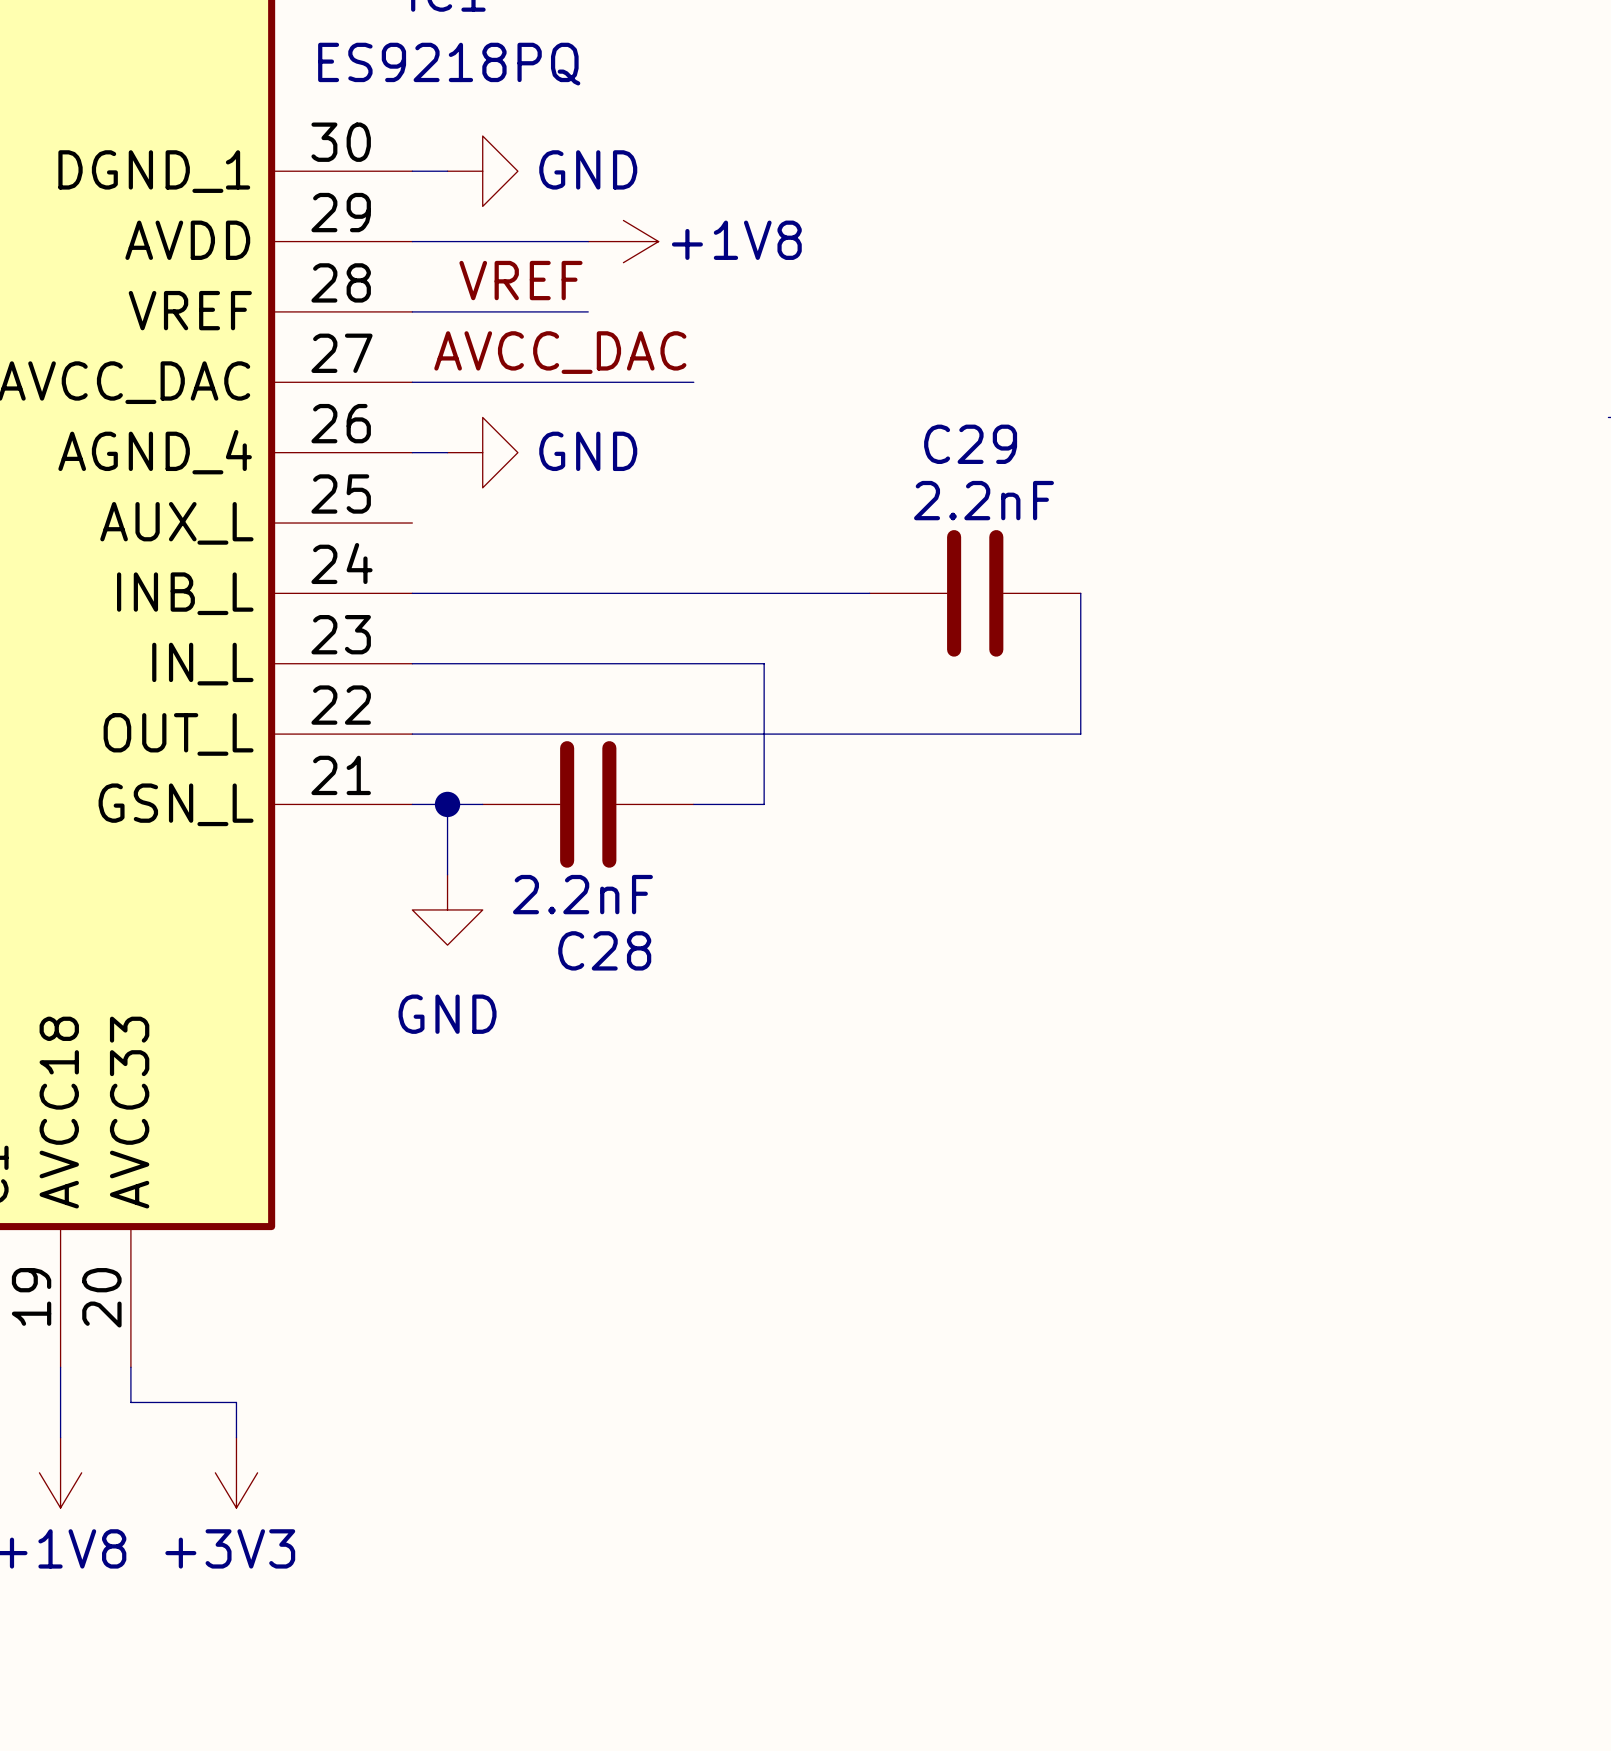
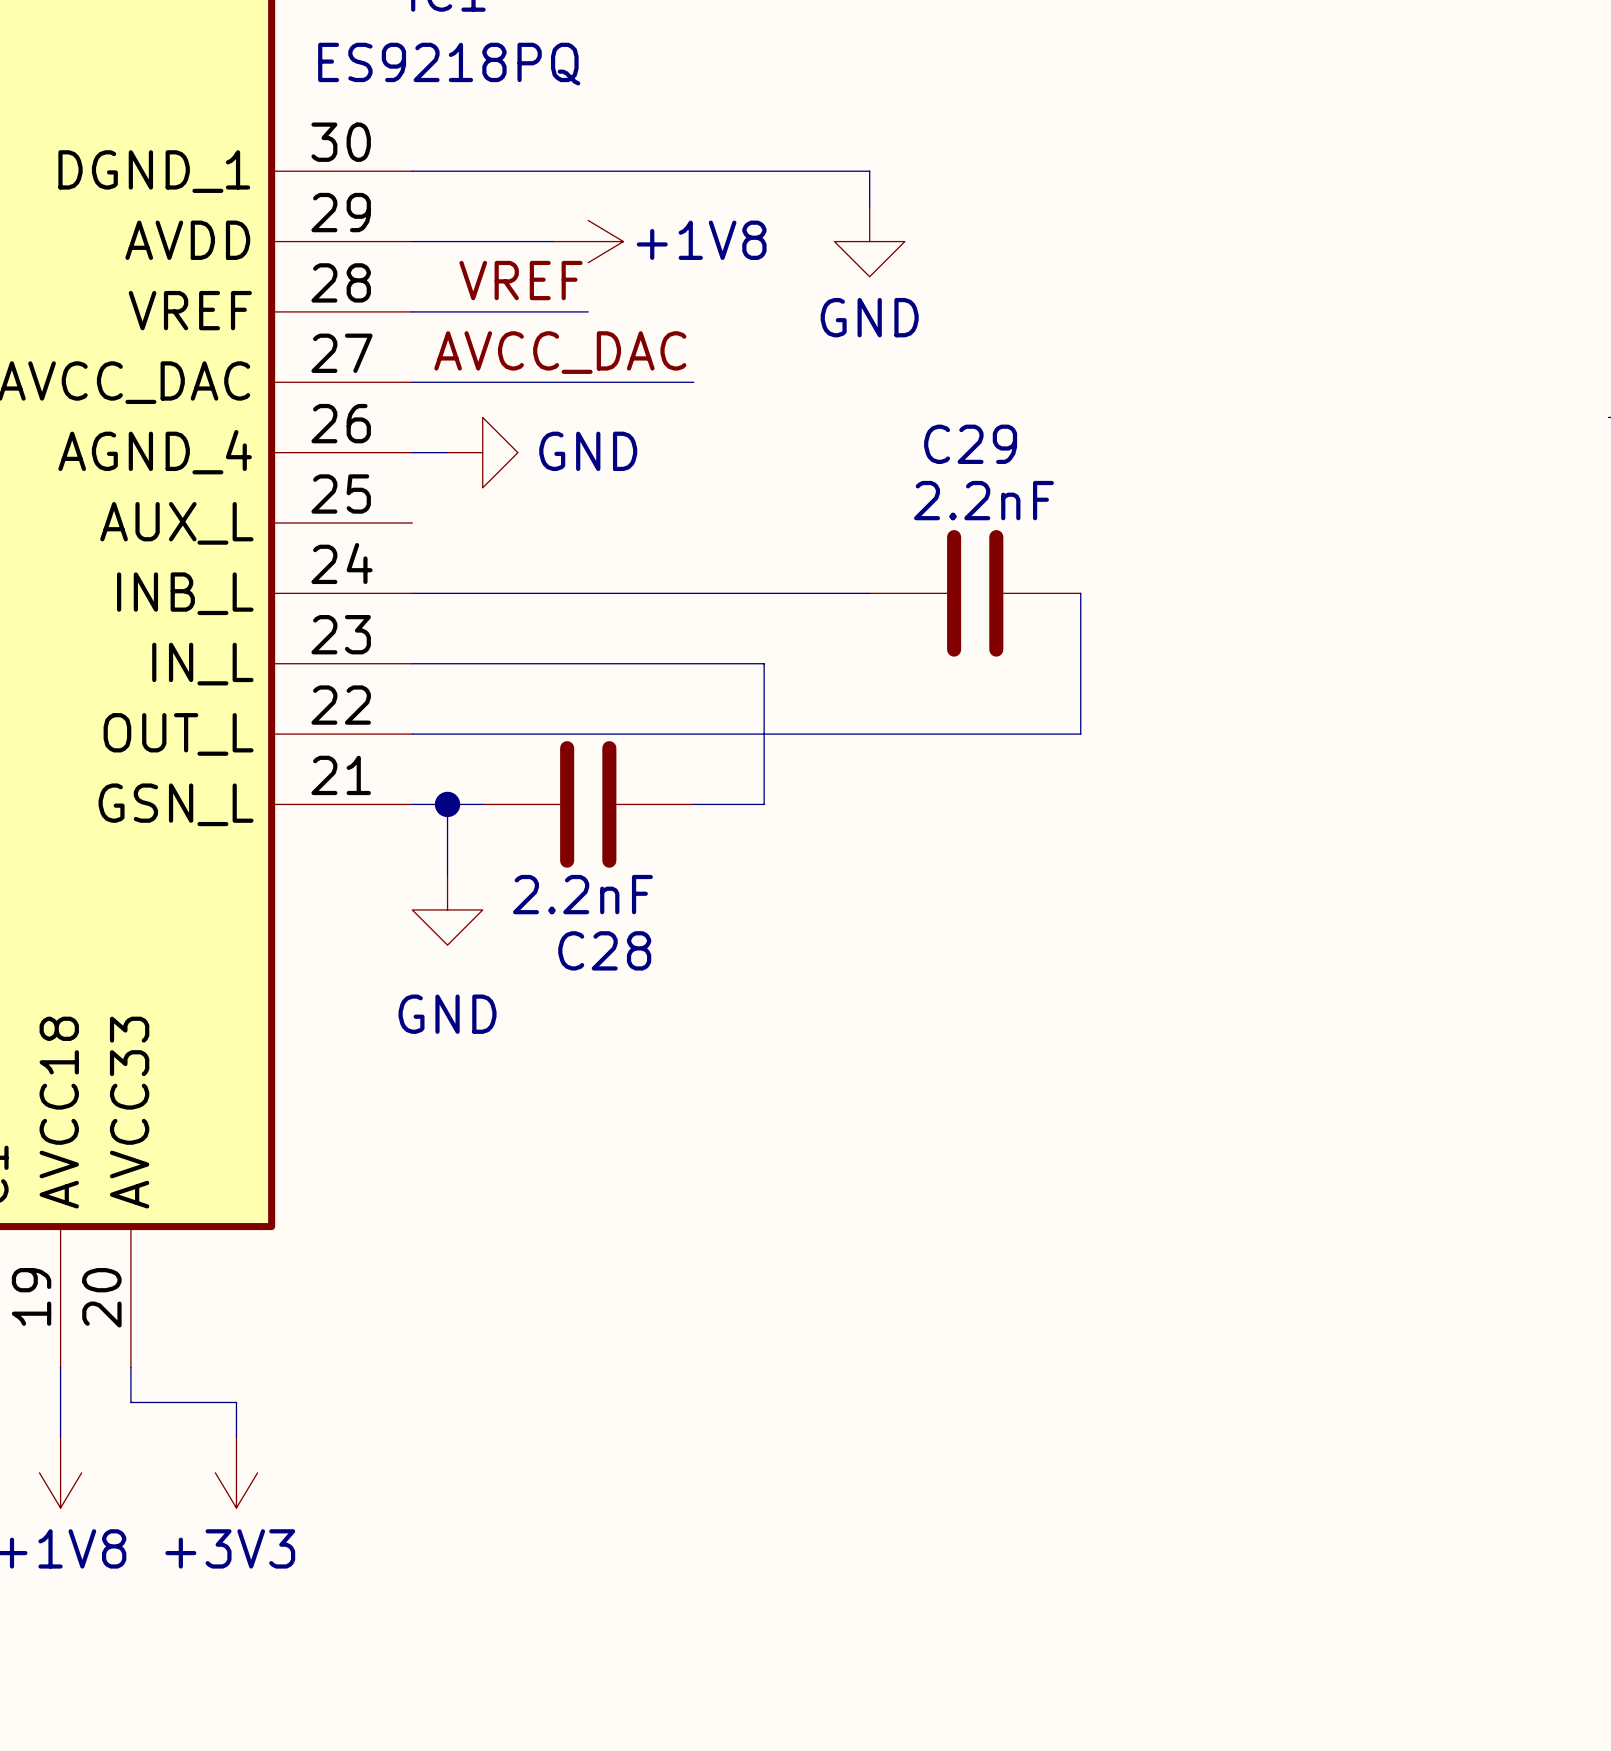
wire: none -> (447, 171) (869, 171) (869, 206)
power symbol rotation: 0° (482, 171) -> 90° clockwise (869, 241)
power symbol position: GND (482, 171) -> GND (869, 241)
power symbol position: +1V8 (623, 241) -> +1V8 (588, 241)

